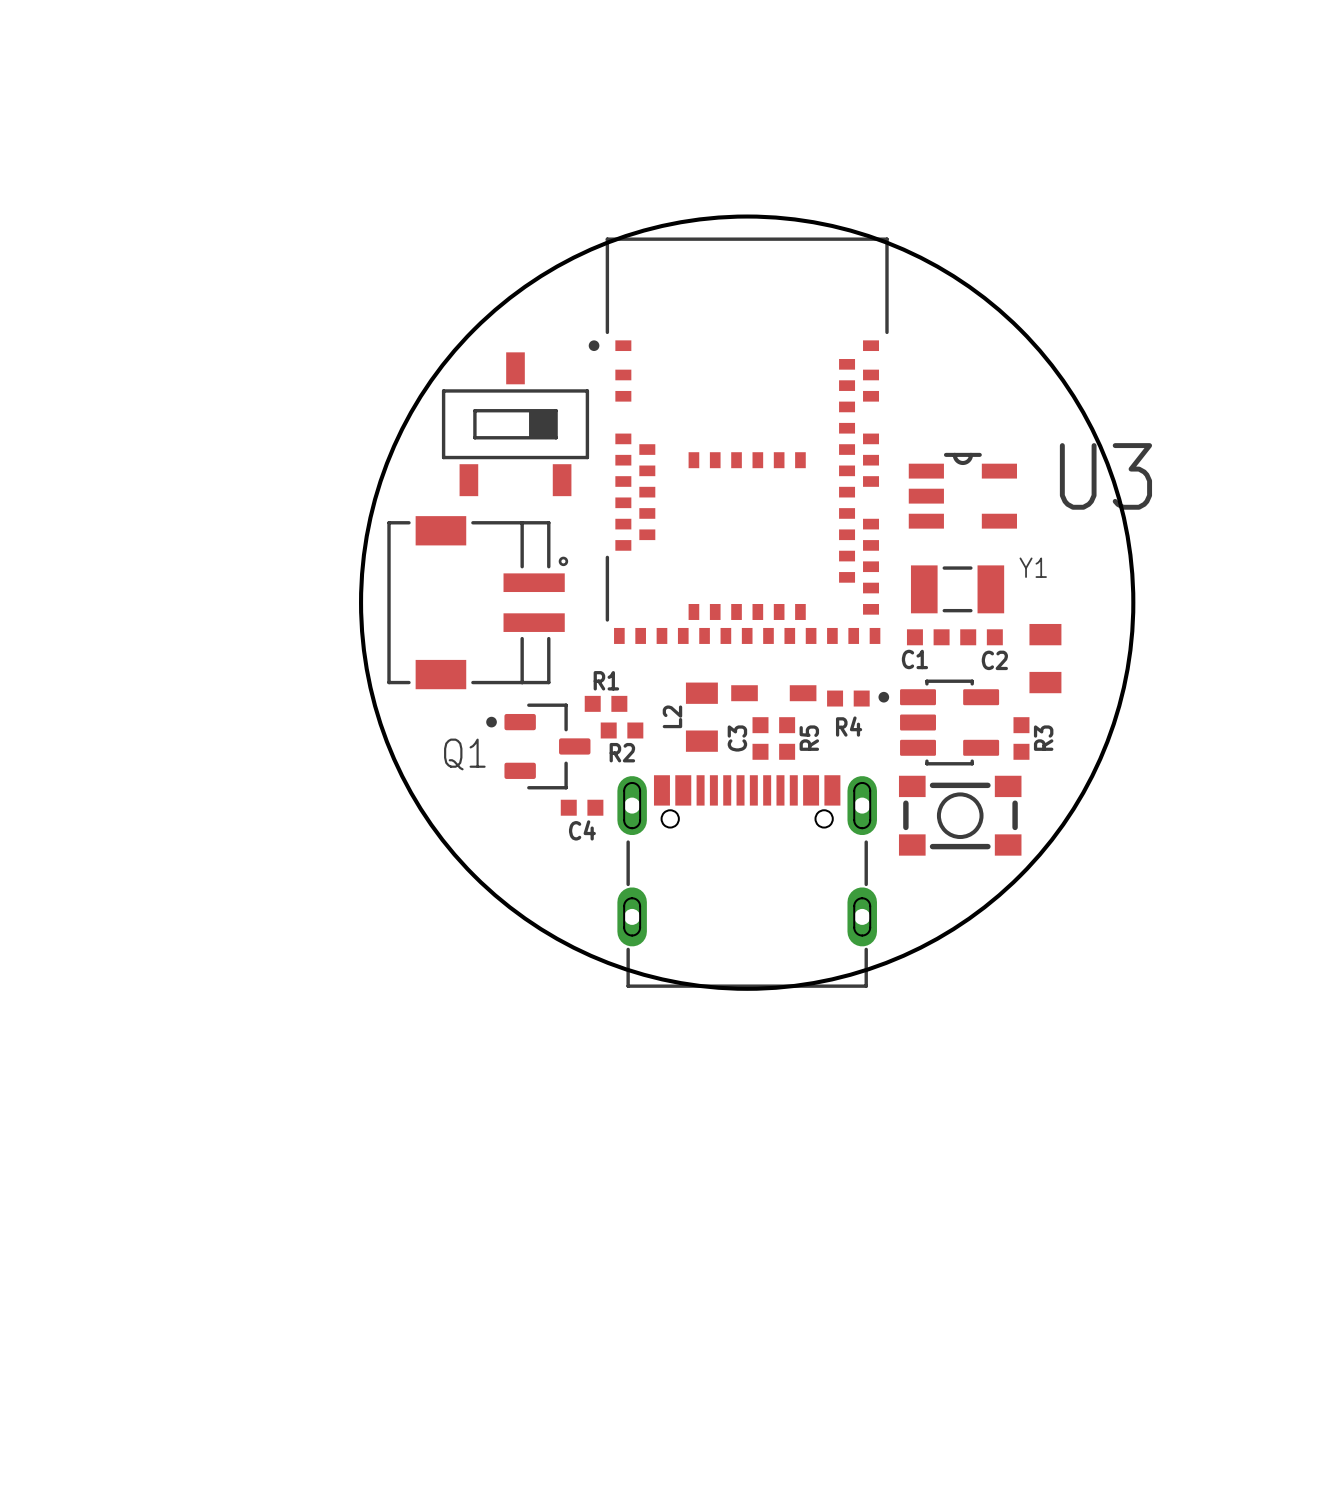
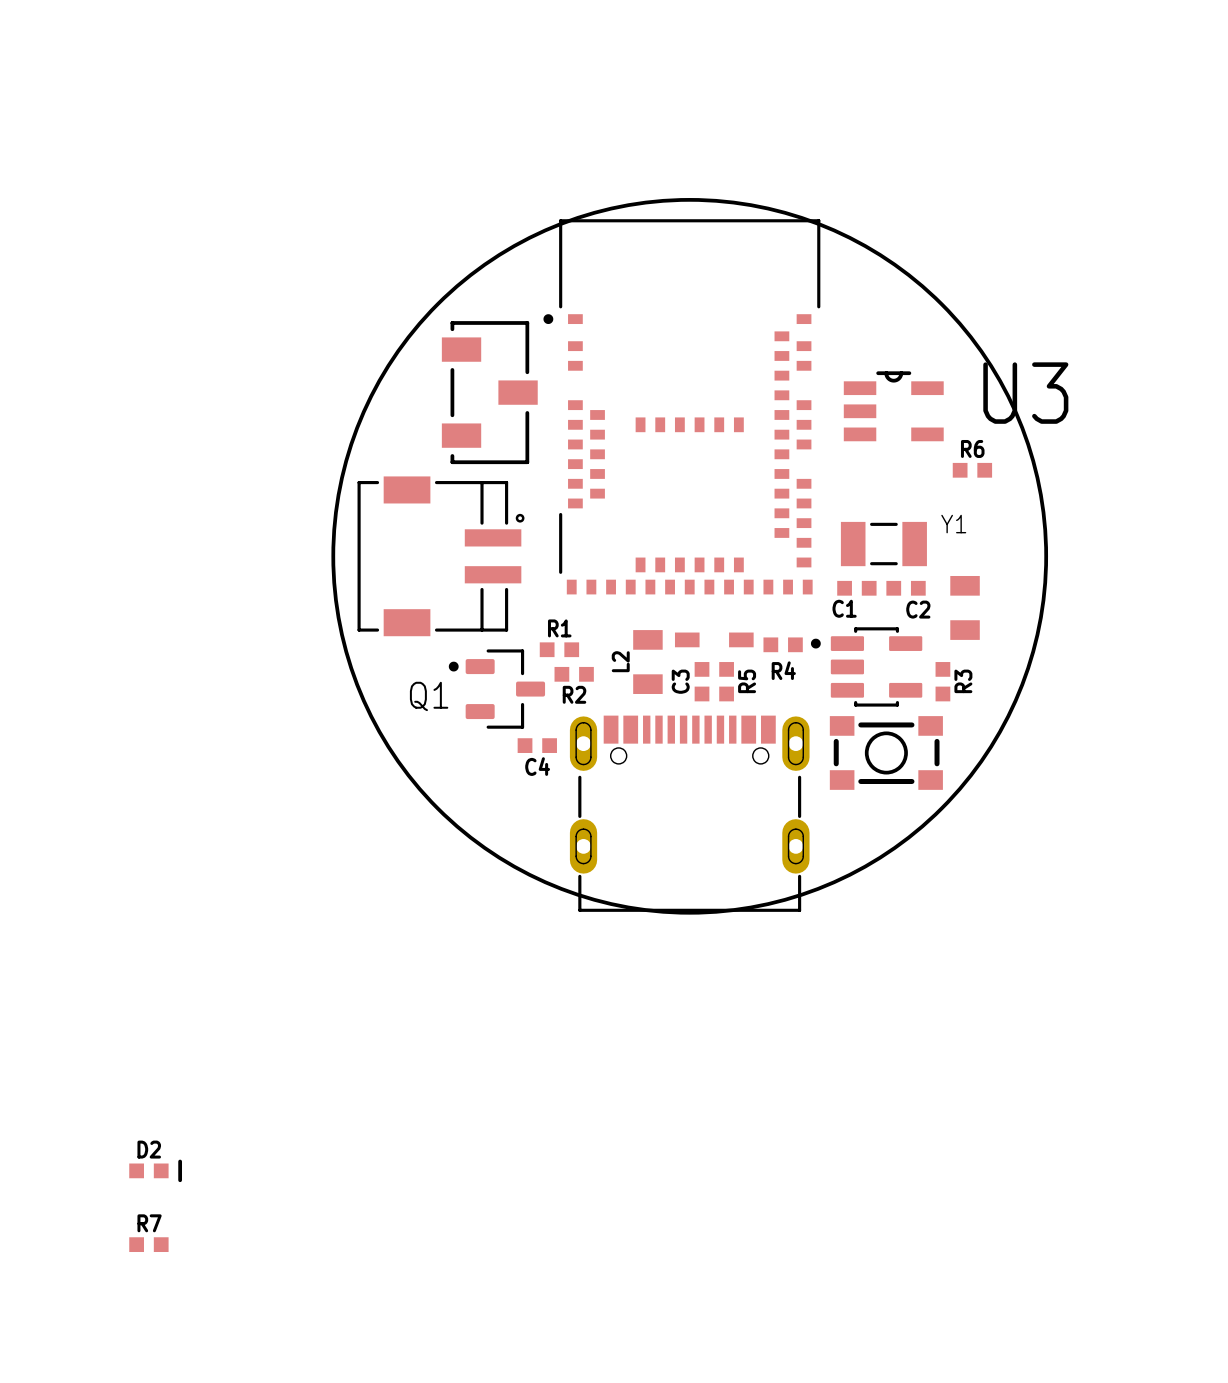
part footprint: [441, 352, 590, 497] -> [441, 321, 538, 465]
U3 position: (962, 490) -> (893, 406)
R6: none -> (972, 470)
D2: none -> (155, 1170)
R7: none -> (148, 1244)

